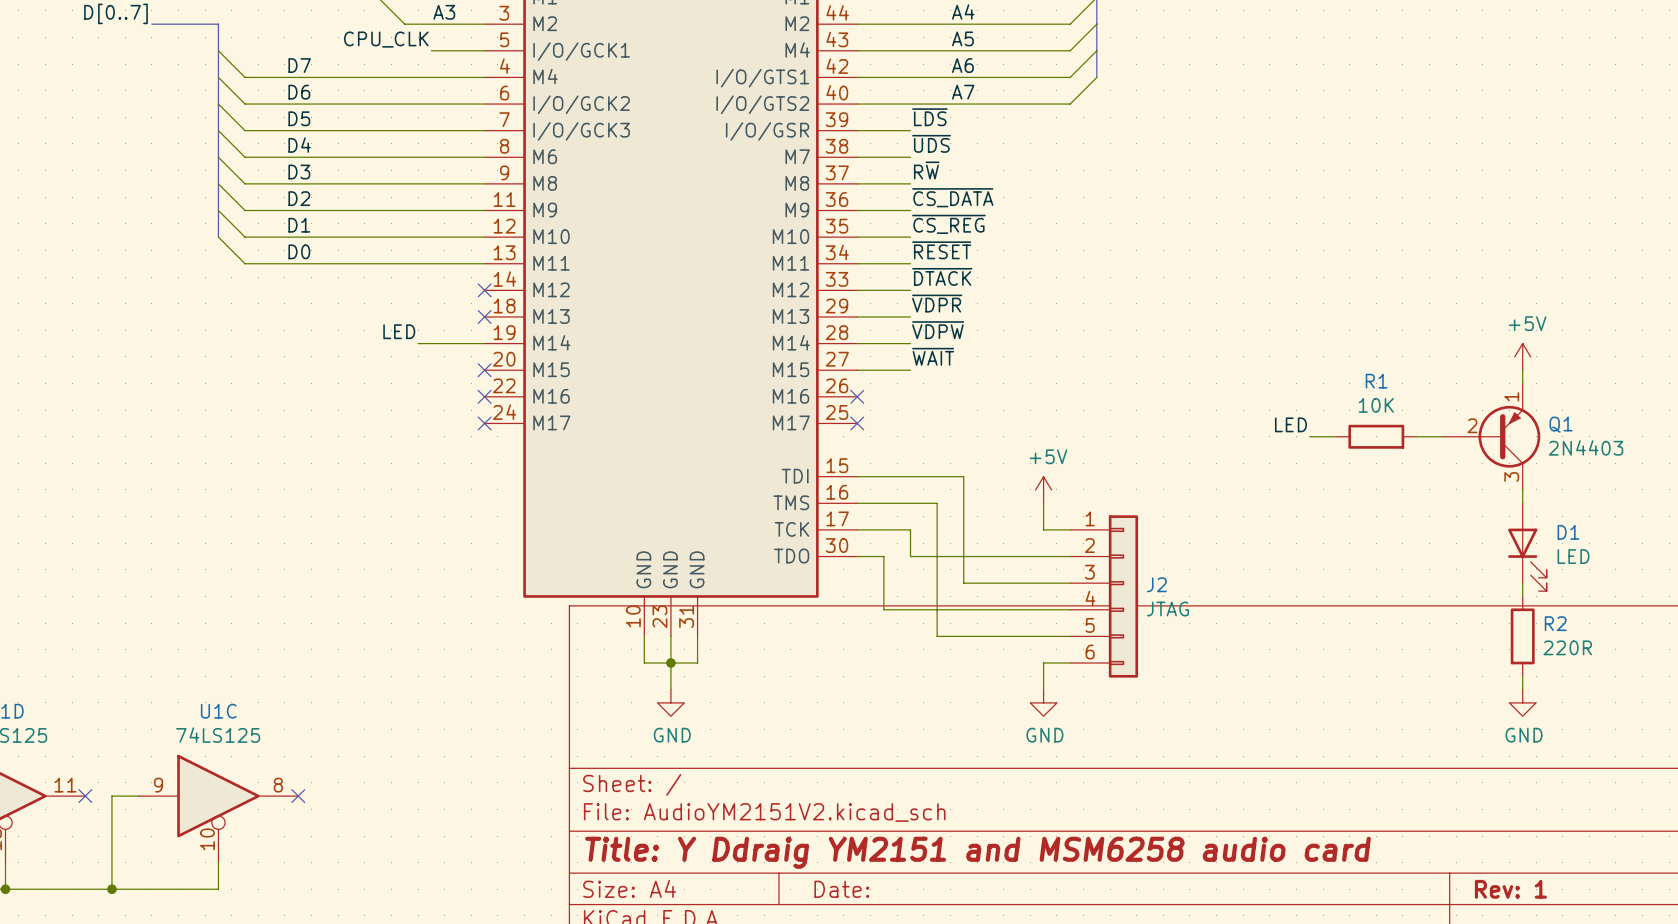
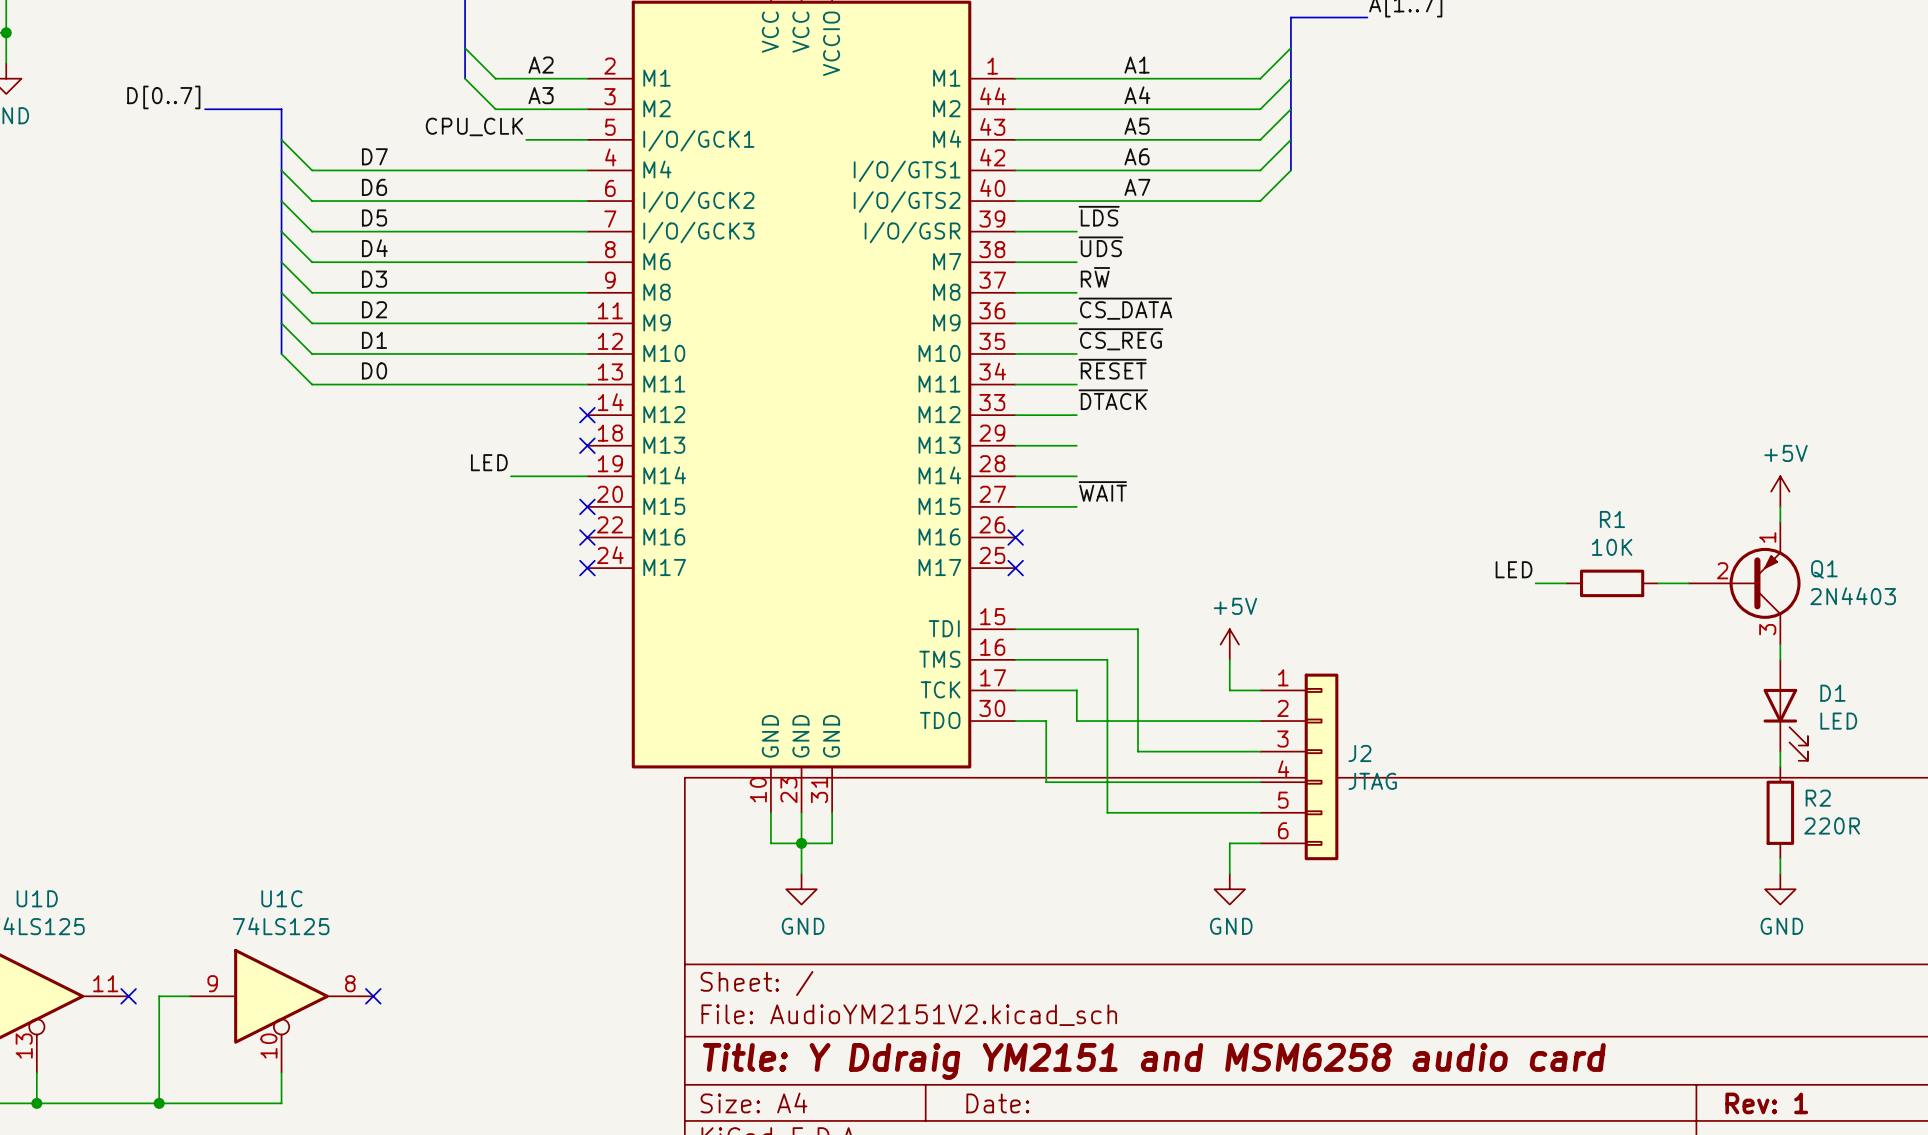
label: ~{VDPR} (937, 303) -> none
label: ~{VDPW} (938, 330) -> none

